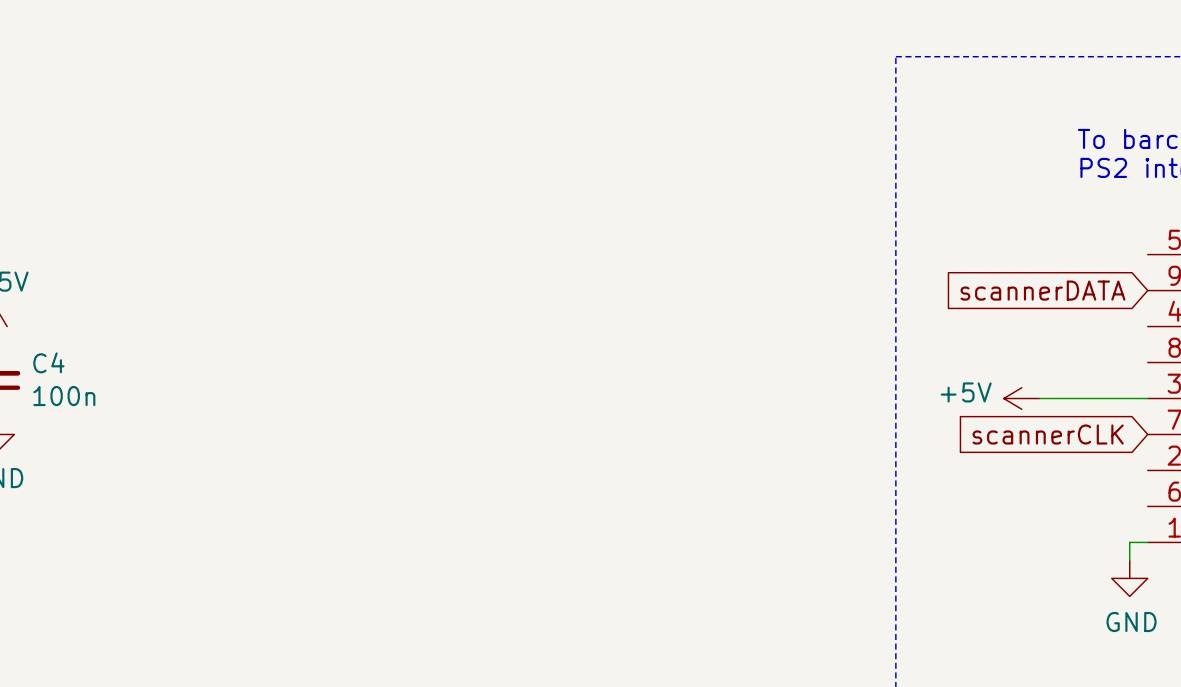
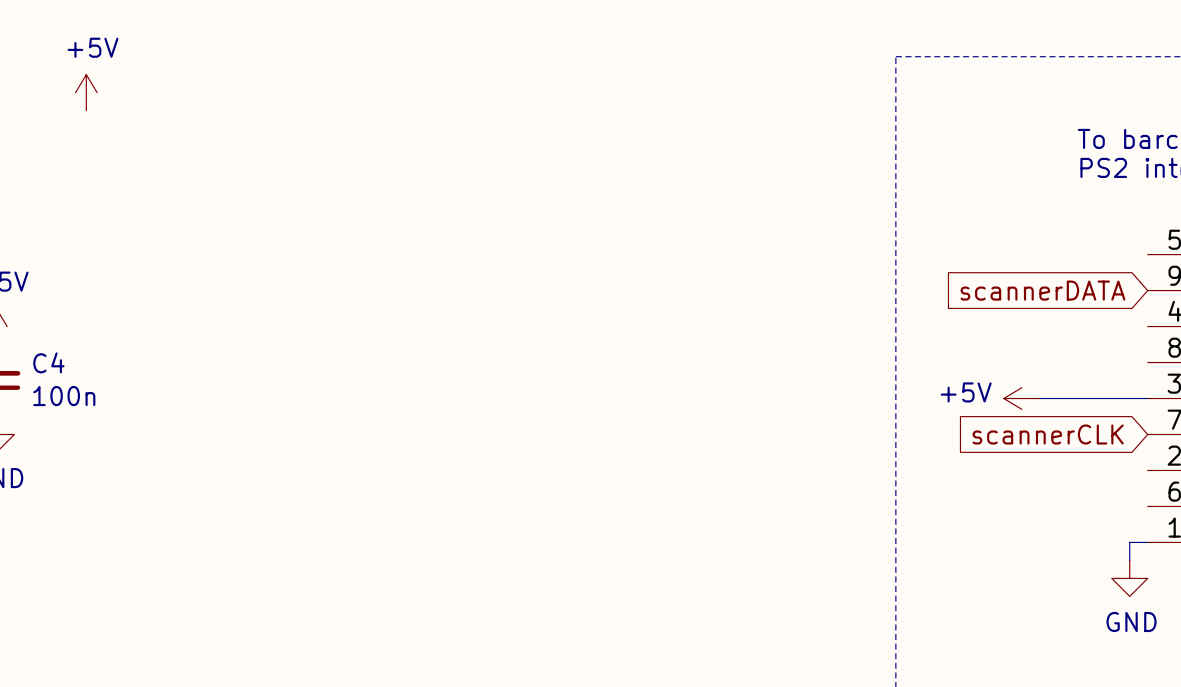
power symbol: none -> +5V (86, 92)

